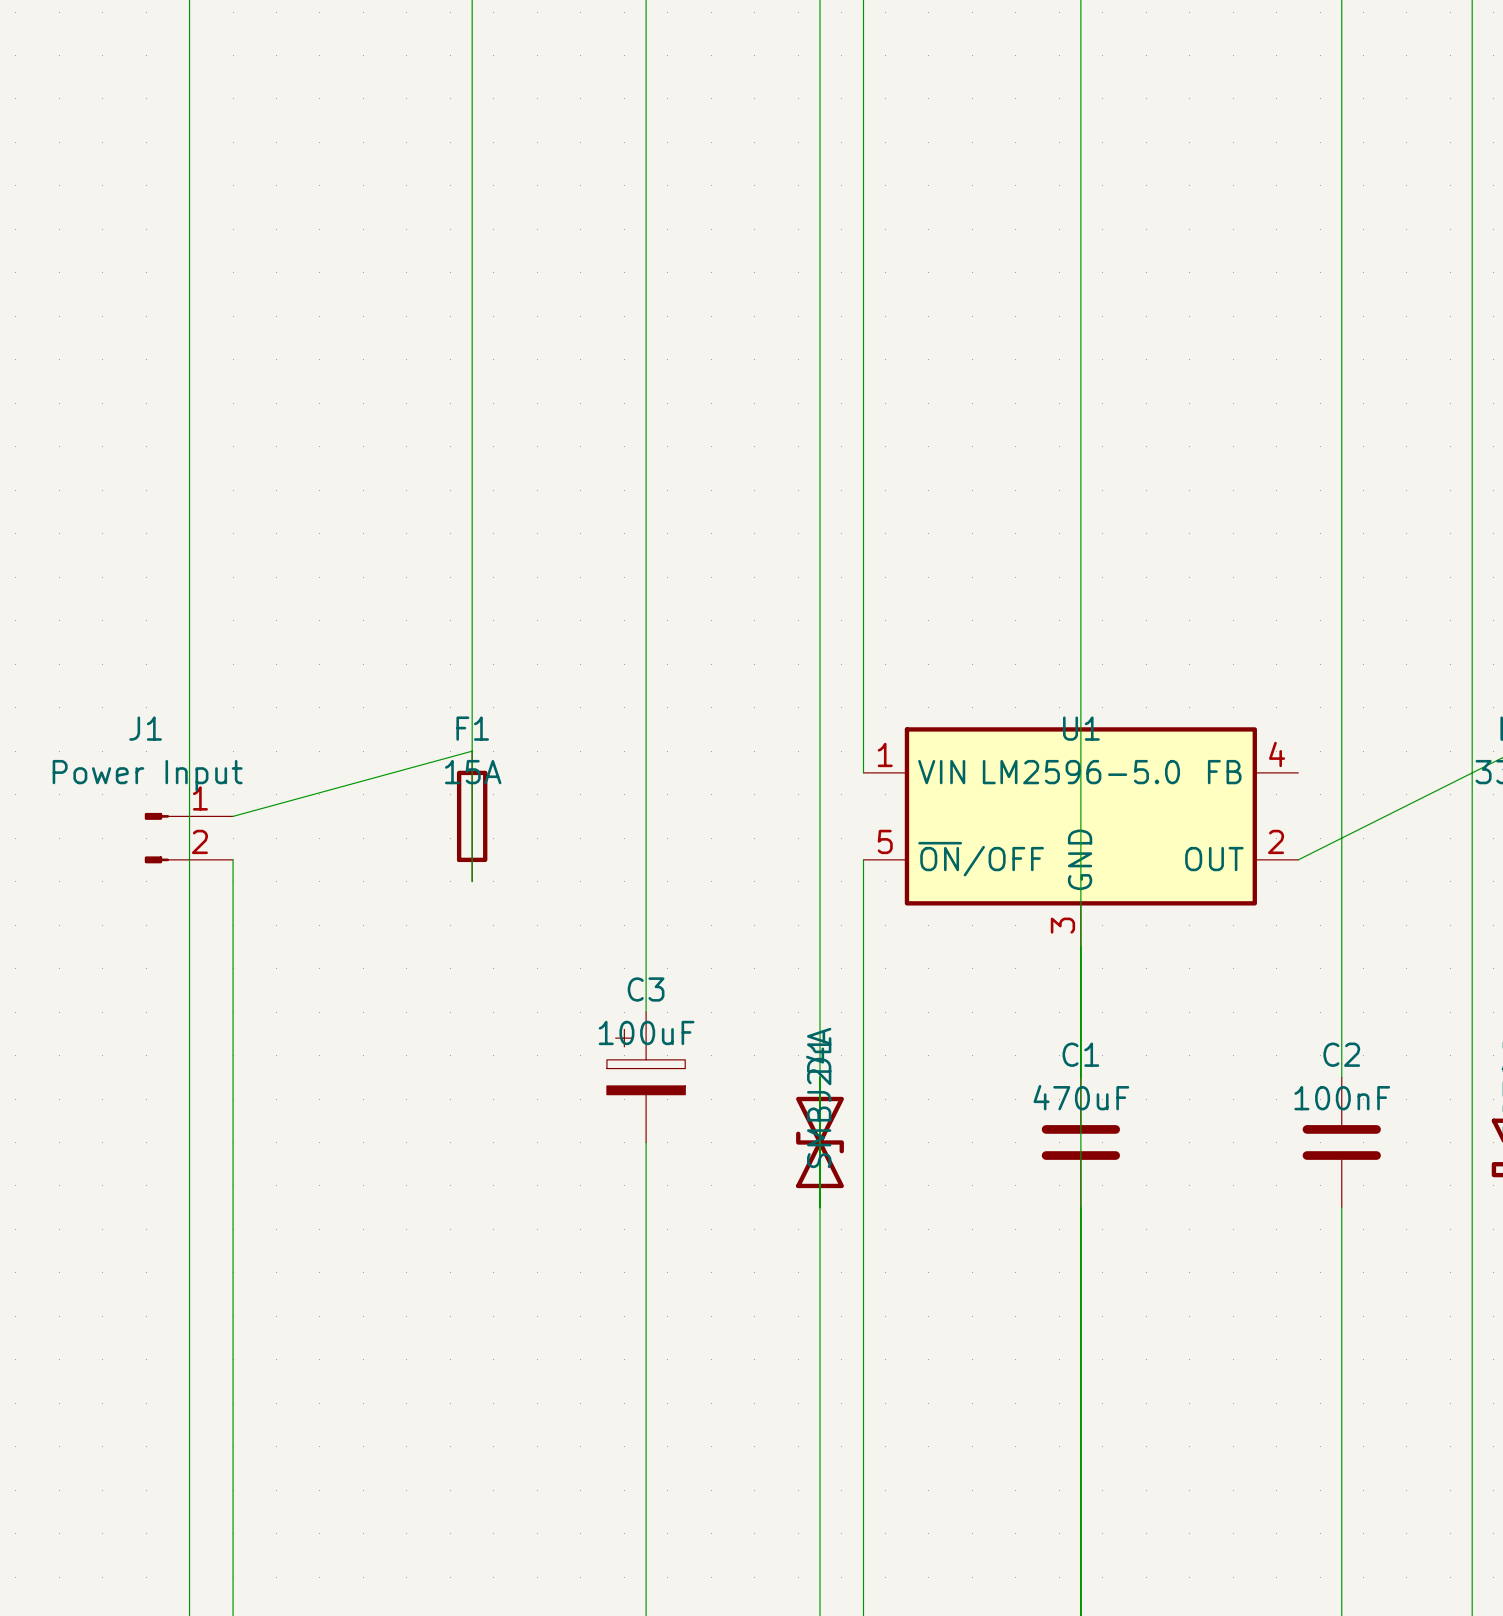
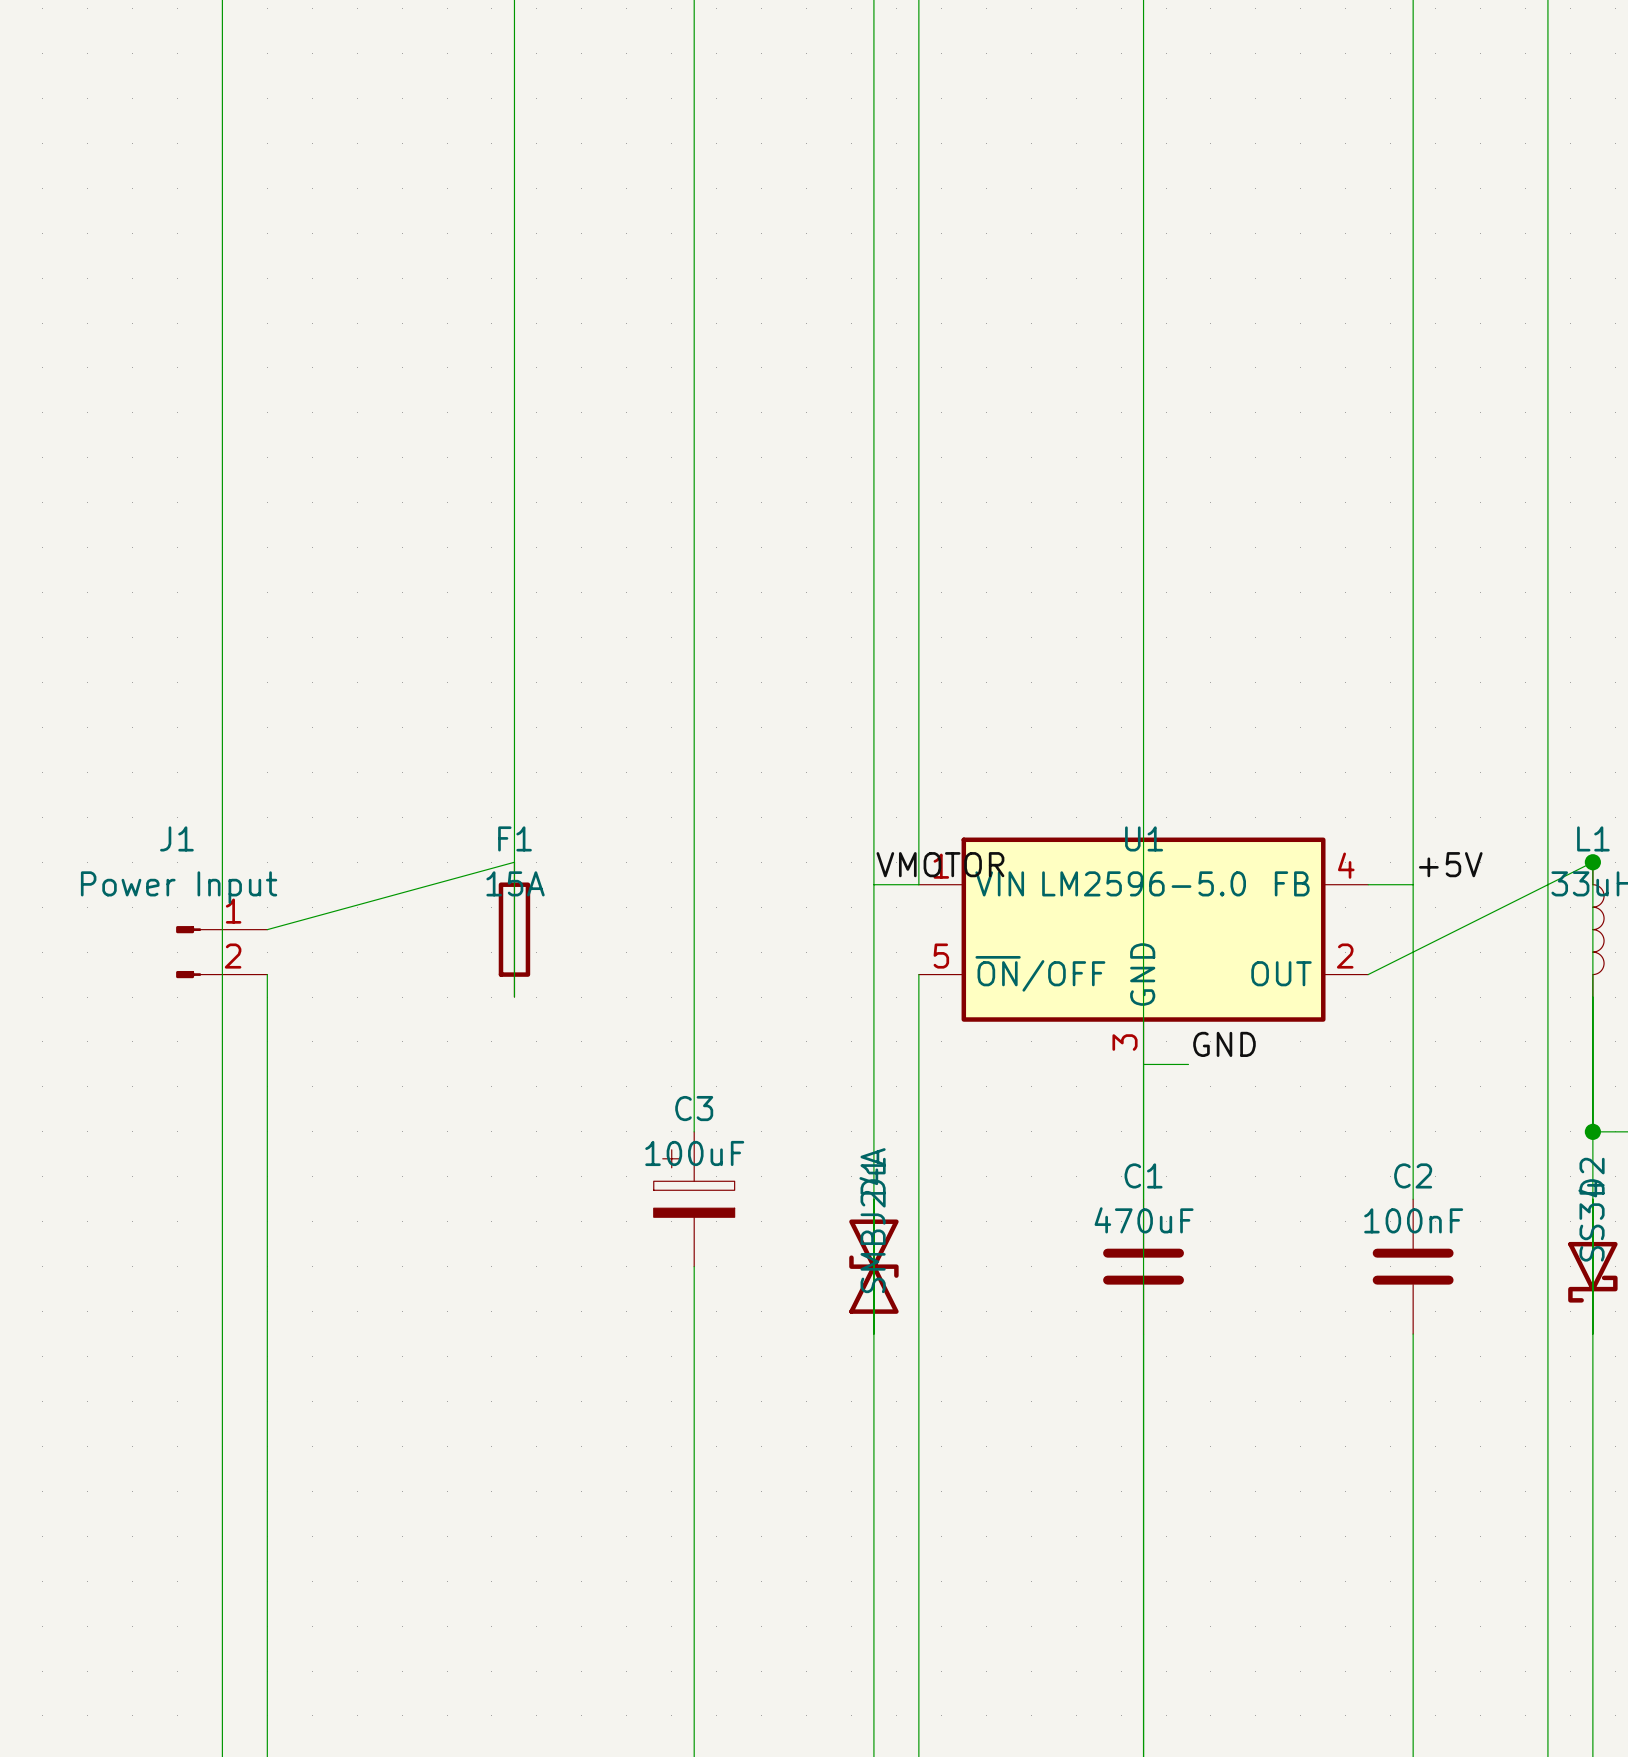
label: none -> VMOTOR (940, 864)
label: none -> +5V (1450, 864)
wire: none -> (873, 884) (918, 884)
wire: none -> (1368, 884) (1413, 884)
label: none -> GND (1224, 1044)
wire: none -> (1143, 1064) (1188, 1064)

